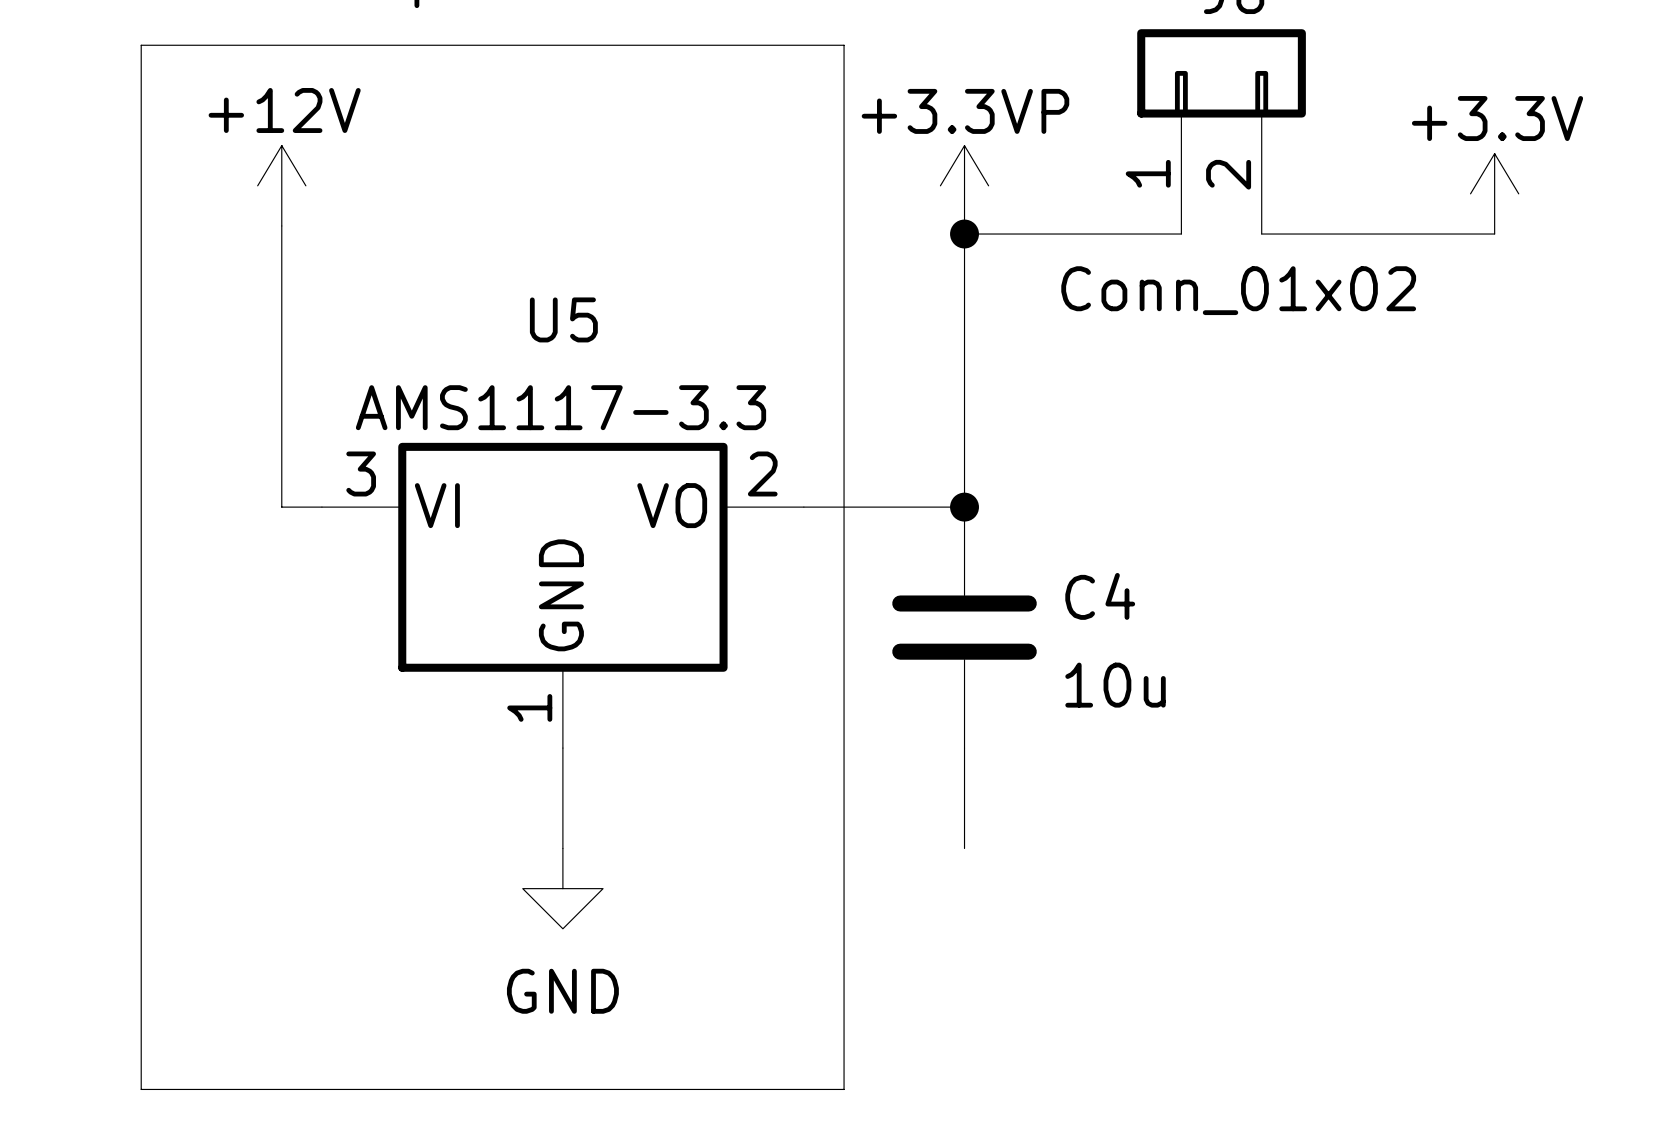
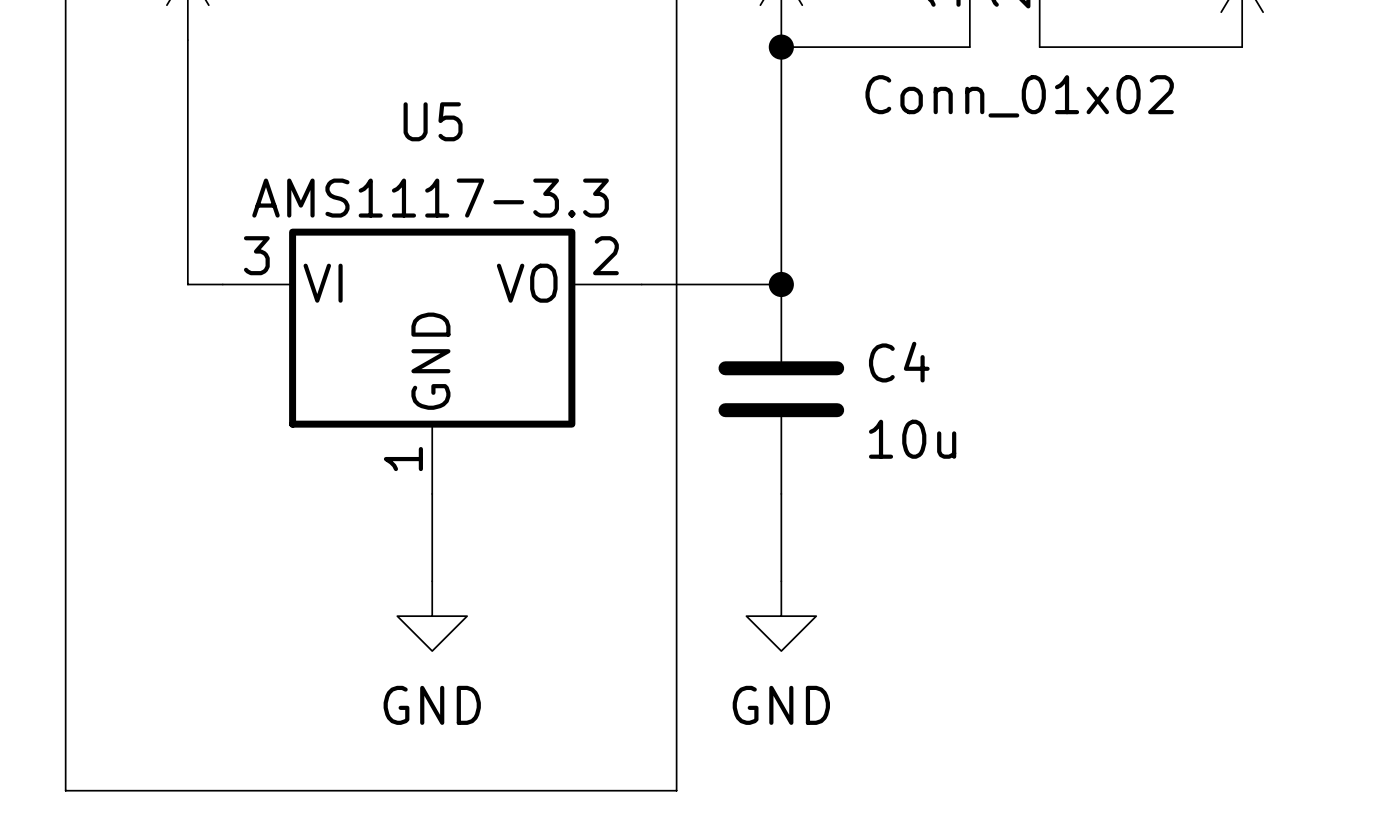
power symbol: none -> GND (781, 616)

